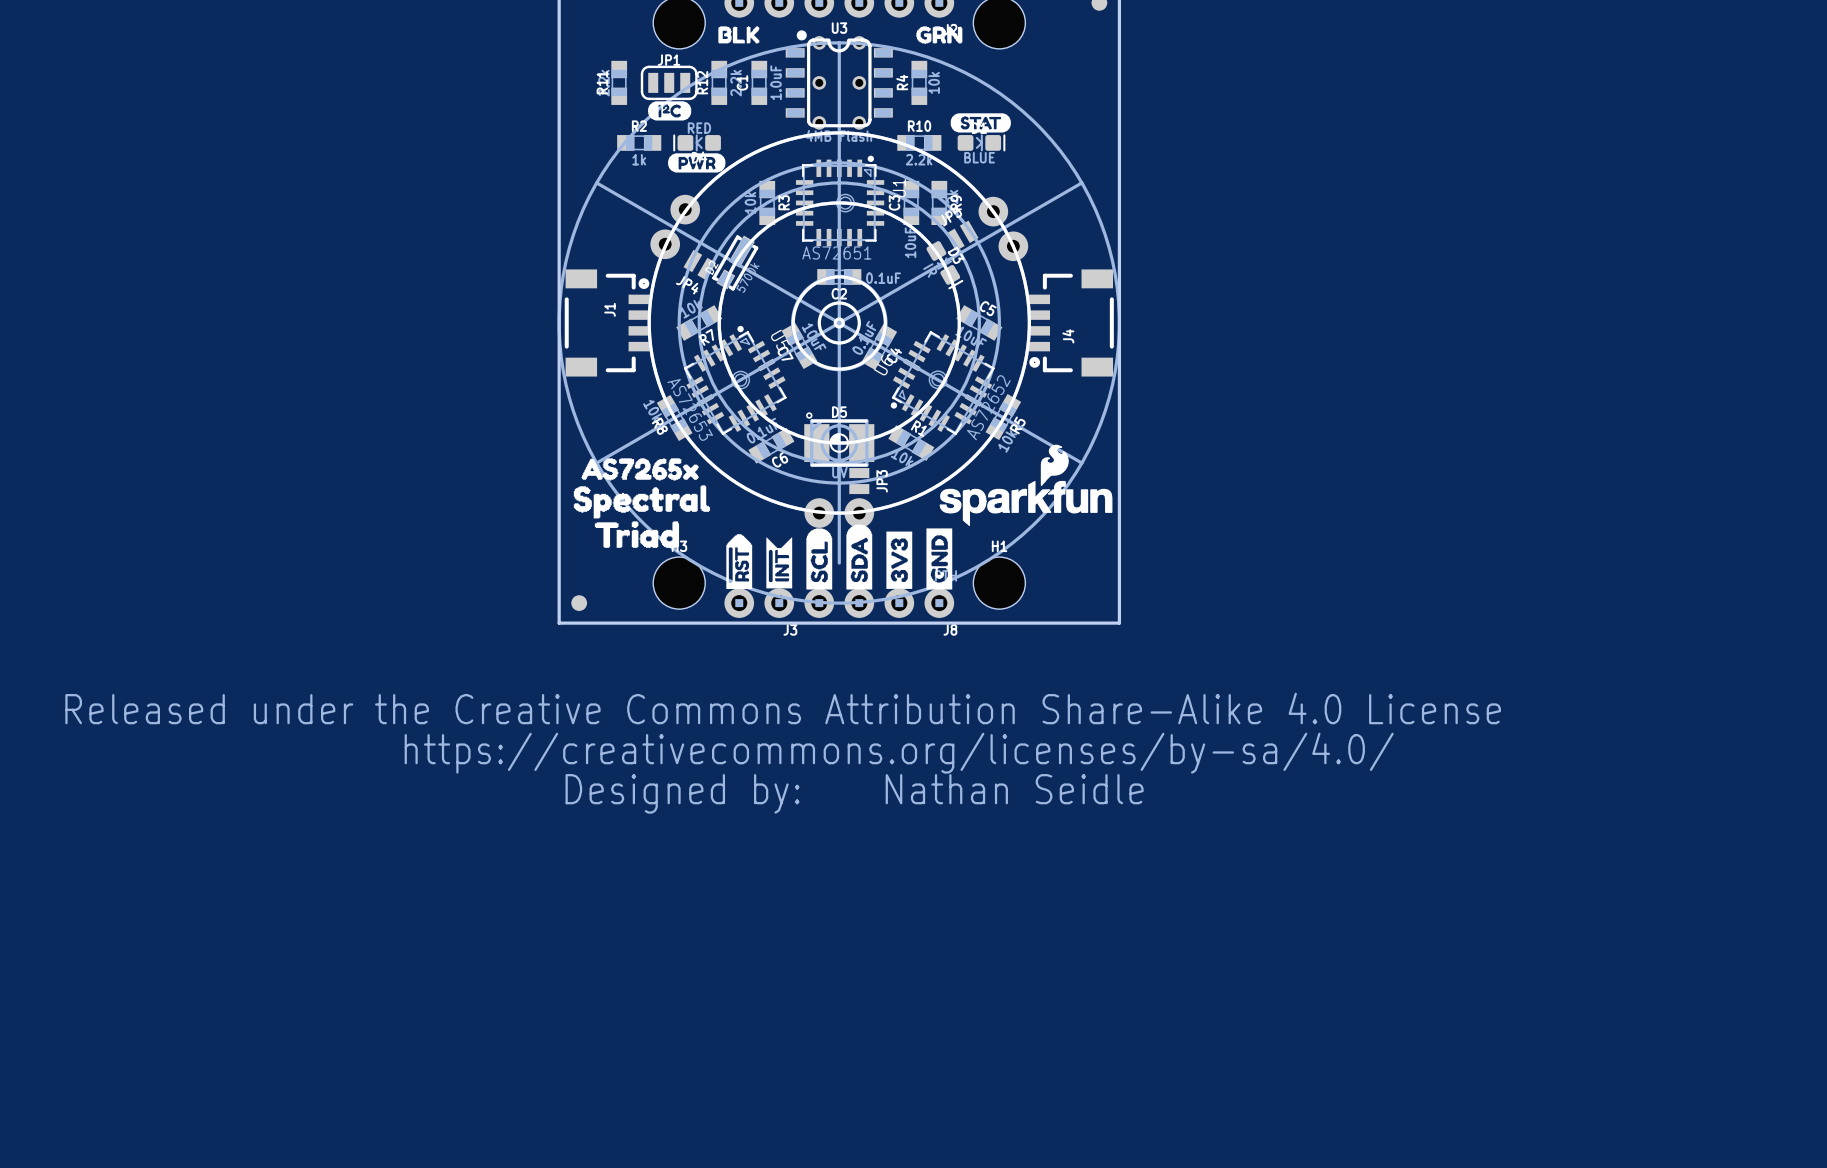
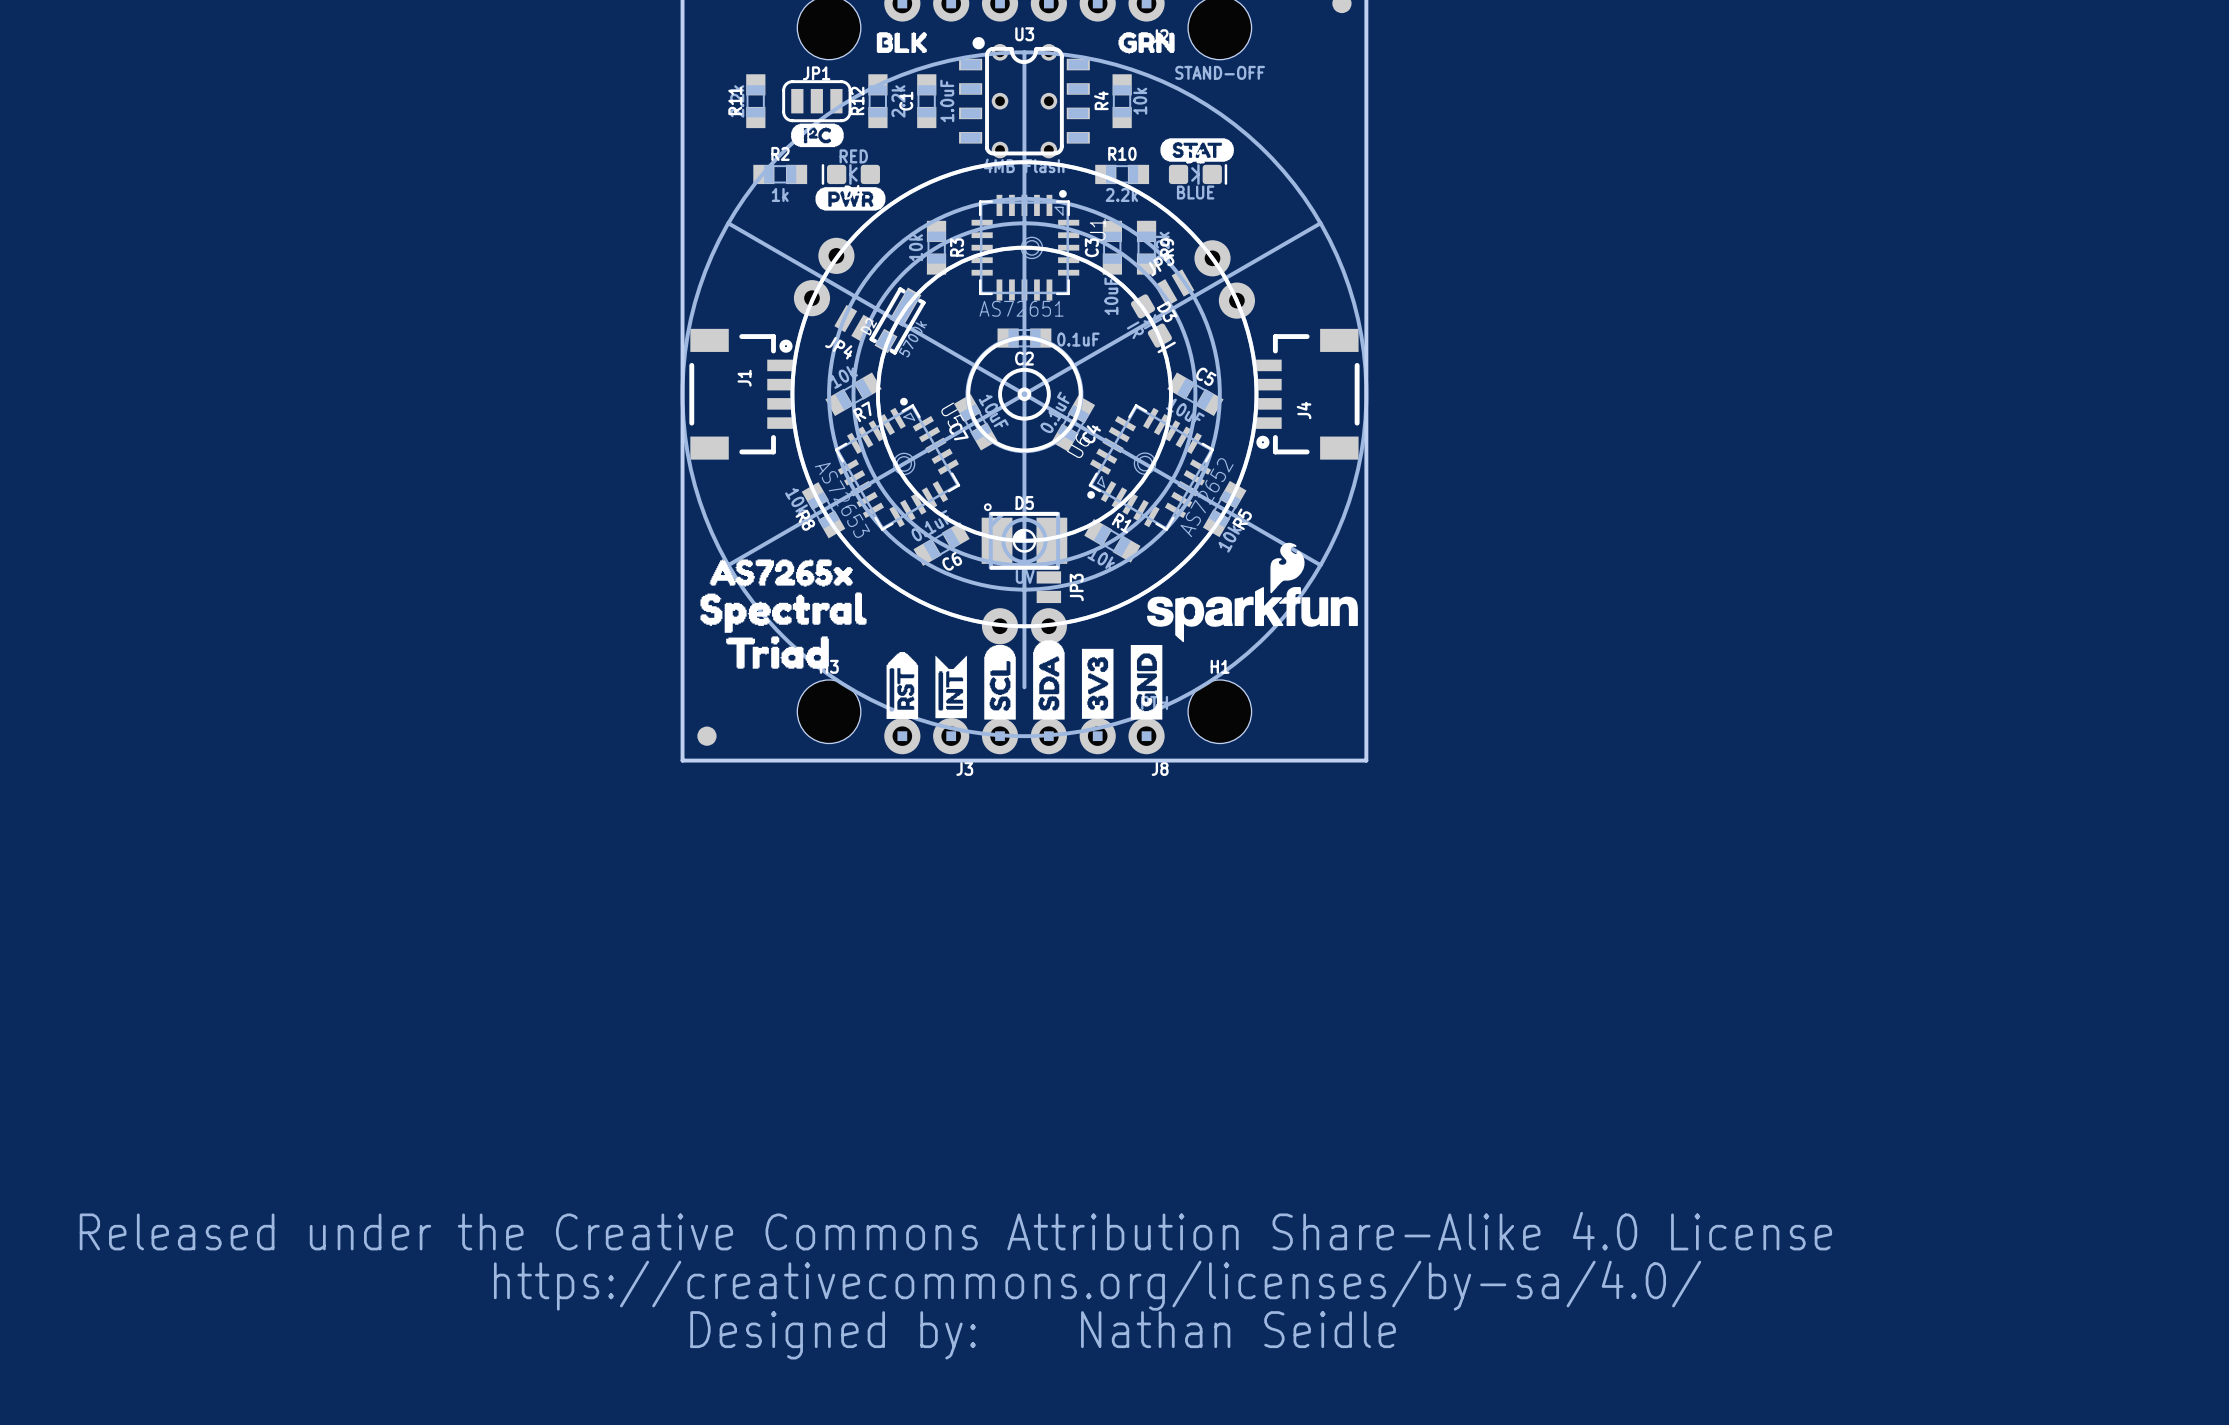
part value: none -> STAND-OFF (1220, 72)
drawing position: (783, 753) -> (955, 1285)
text position: Nathan Seidle (1014, 789) -> Nathan Seidle (1238, 1329)

